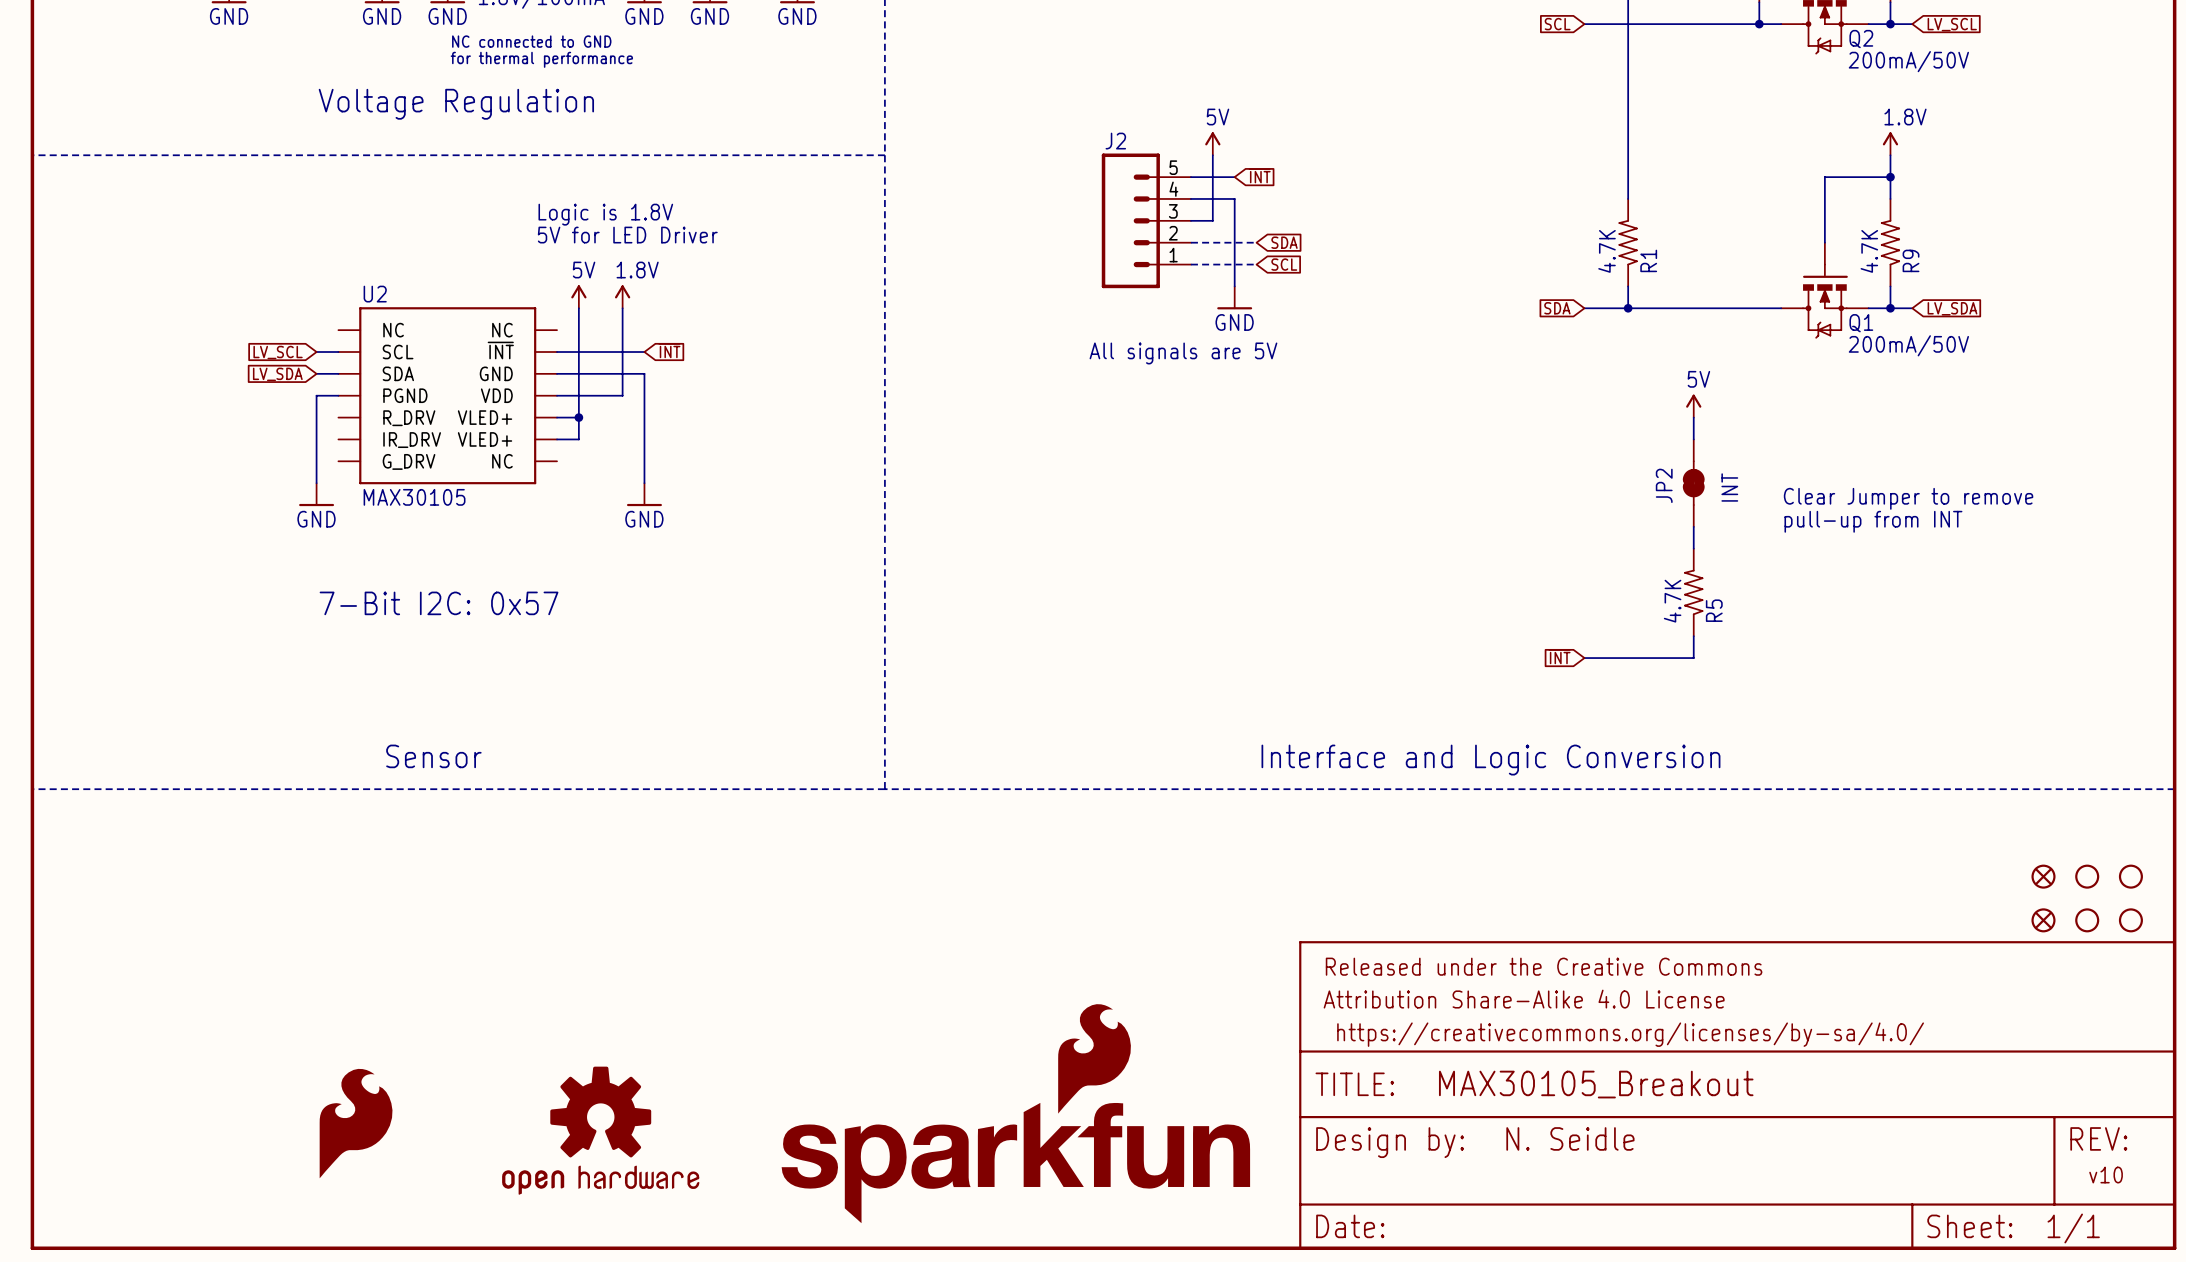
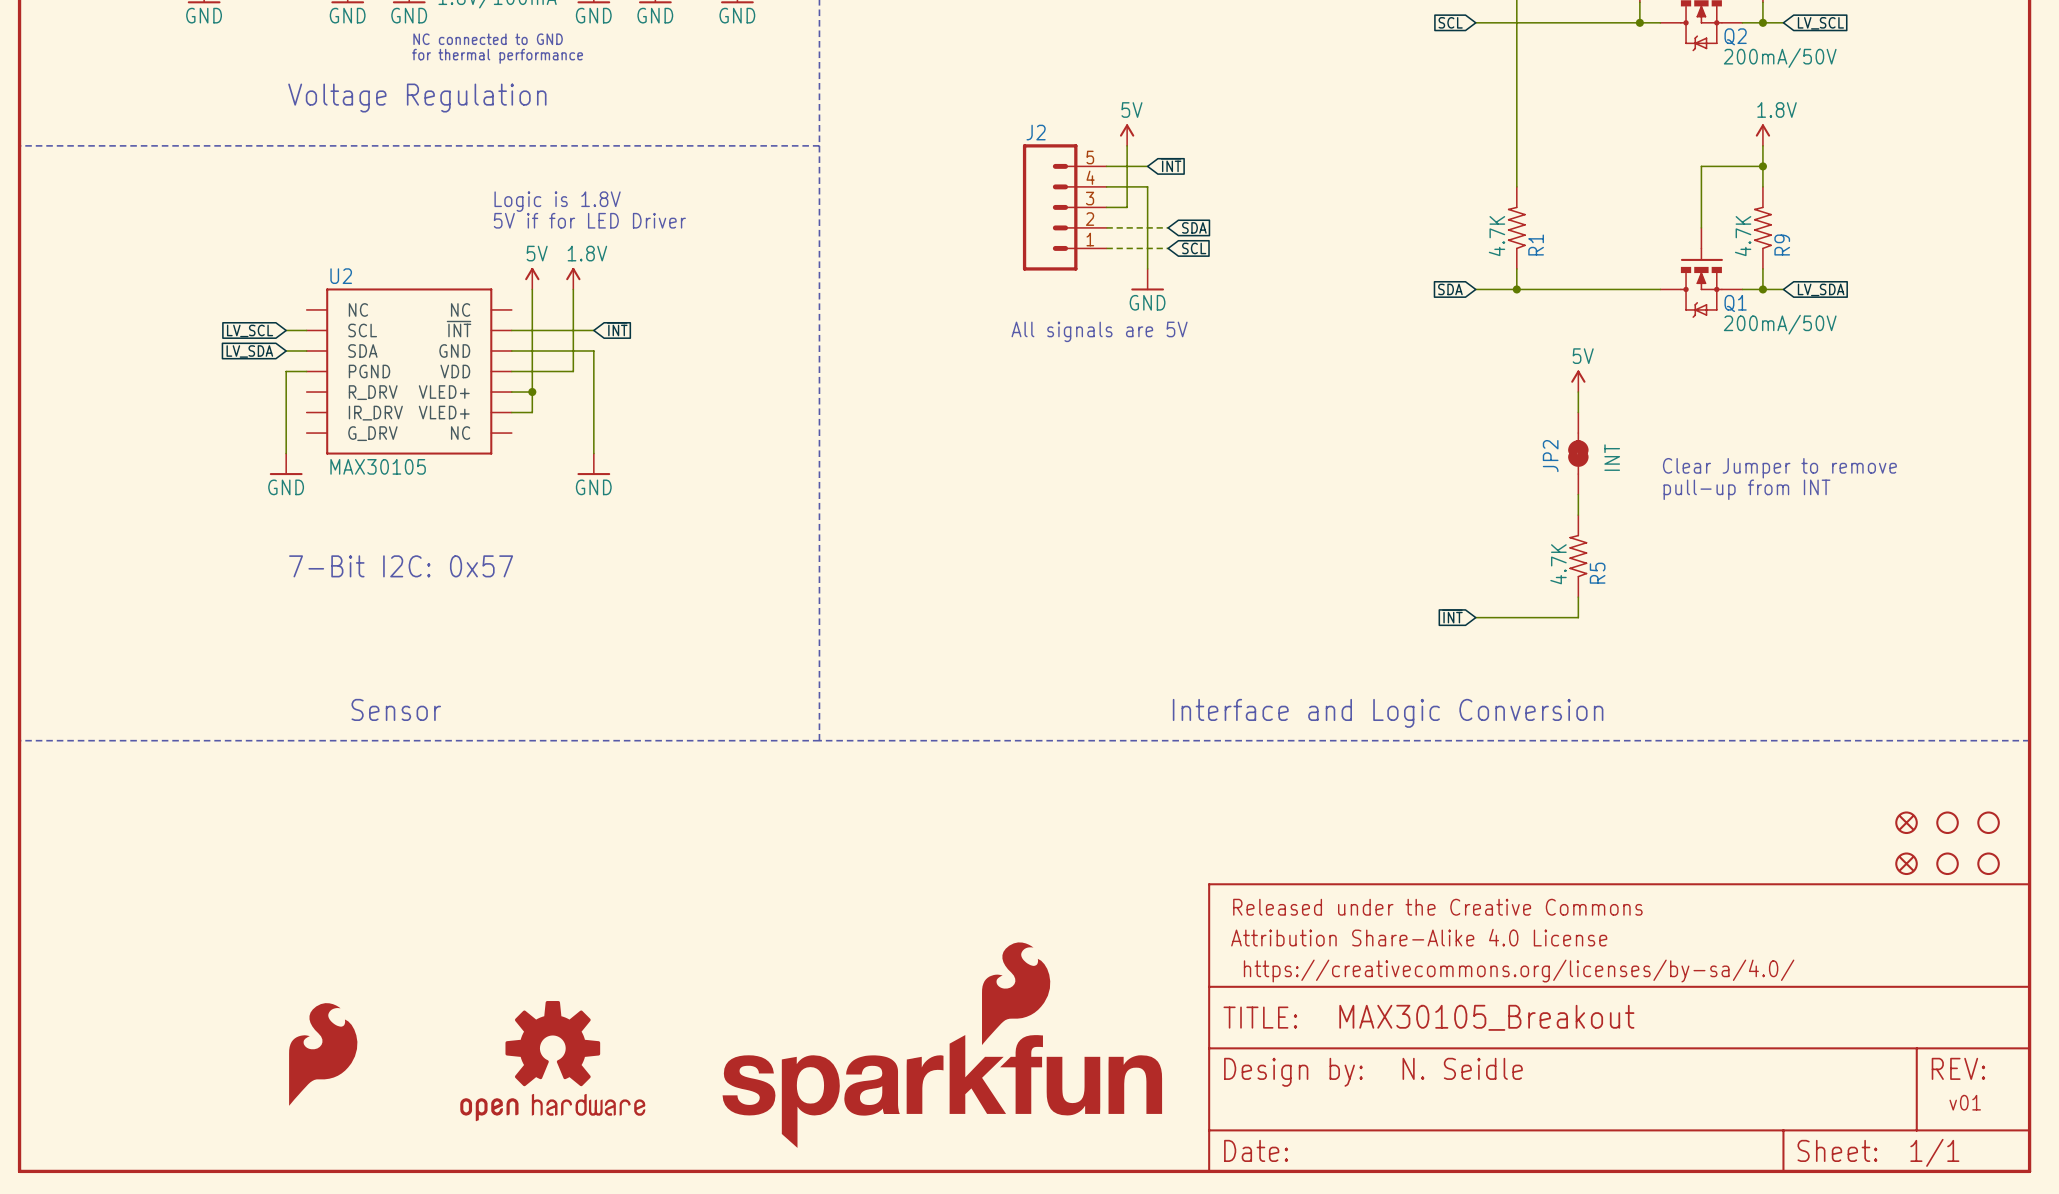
text: 5V for LED Driver (627, 235) -> 5V if for LED Driver (589, 220)
text: v10 (2106, 1175) -> v01 (1965, 1102)

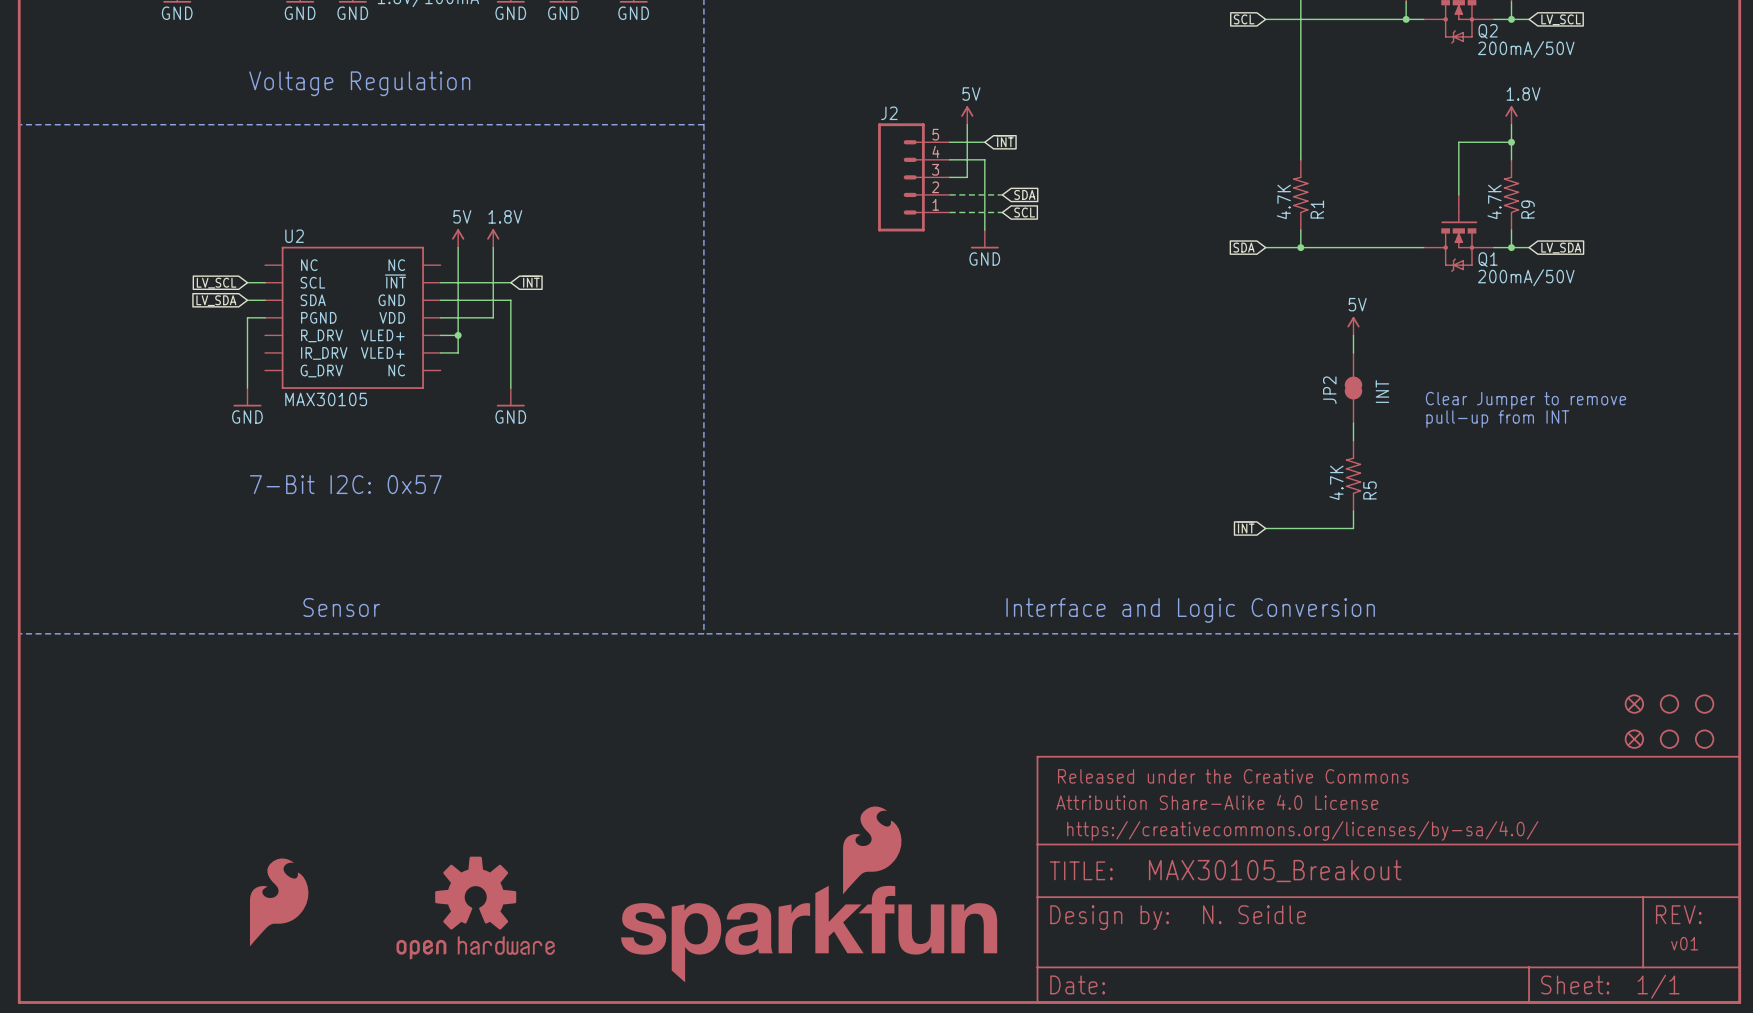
text: NC connected to GND (488, 39) -> none
text: for thermal performance (497, 56) -> none
text: Logic is 1.8V (557, 201) -> none
text: 5V if for LED Driver (589, 220) -> none
text: All signals are 5V (1099, 331) -> none

